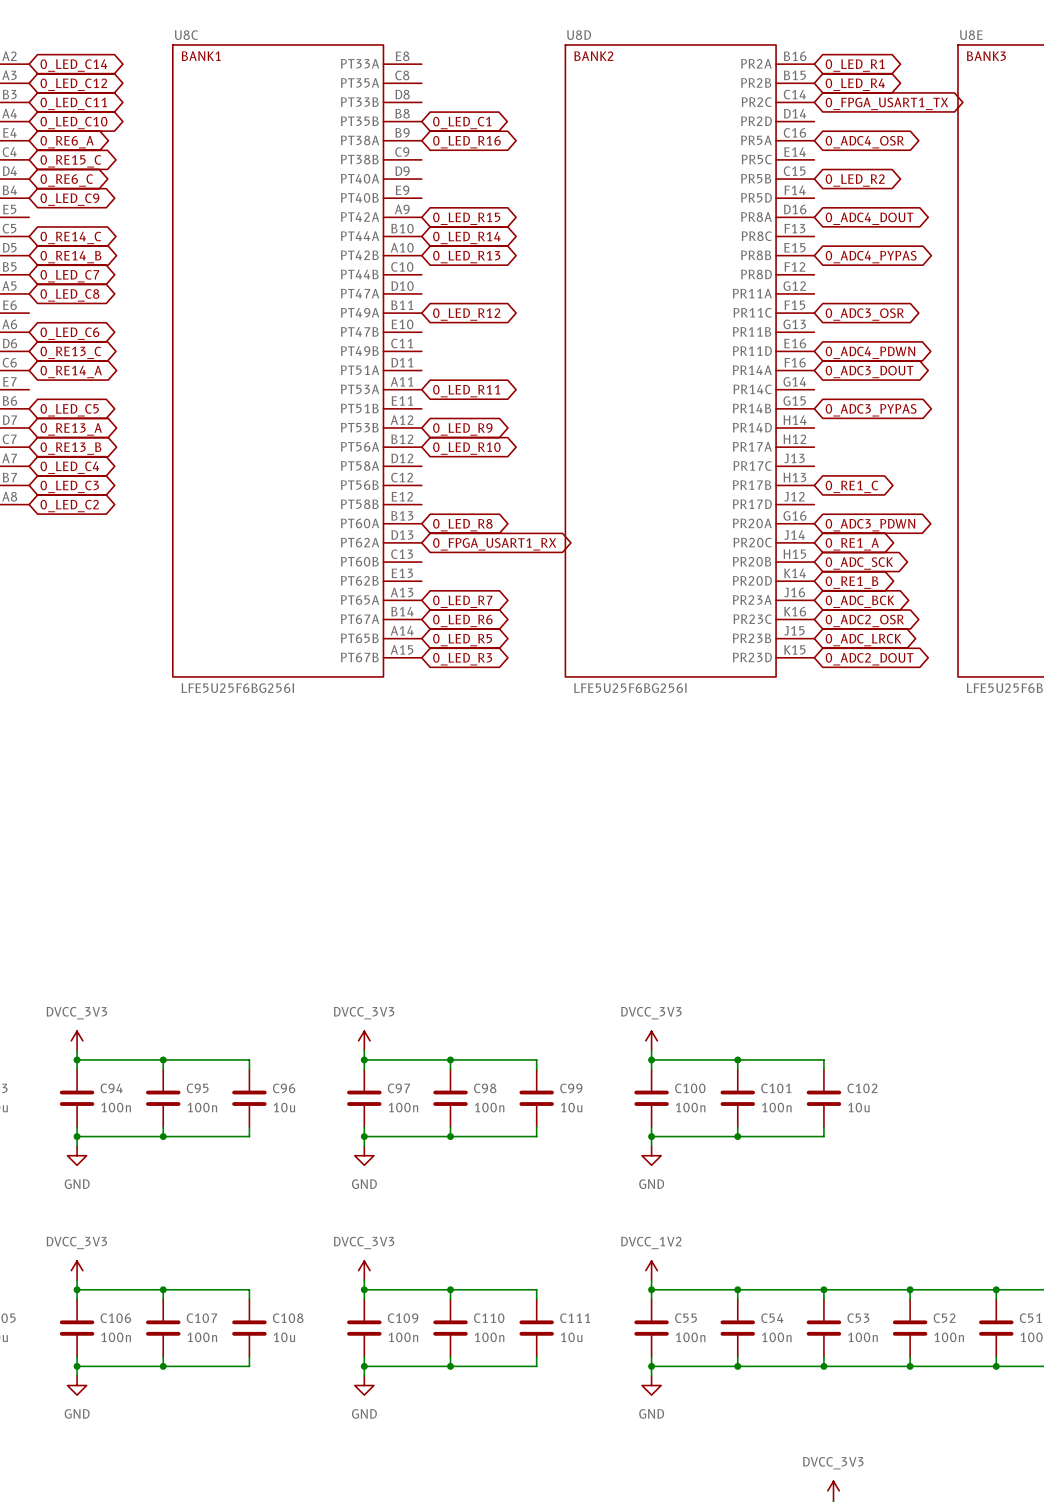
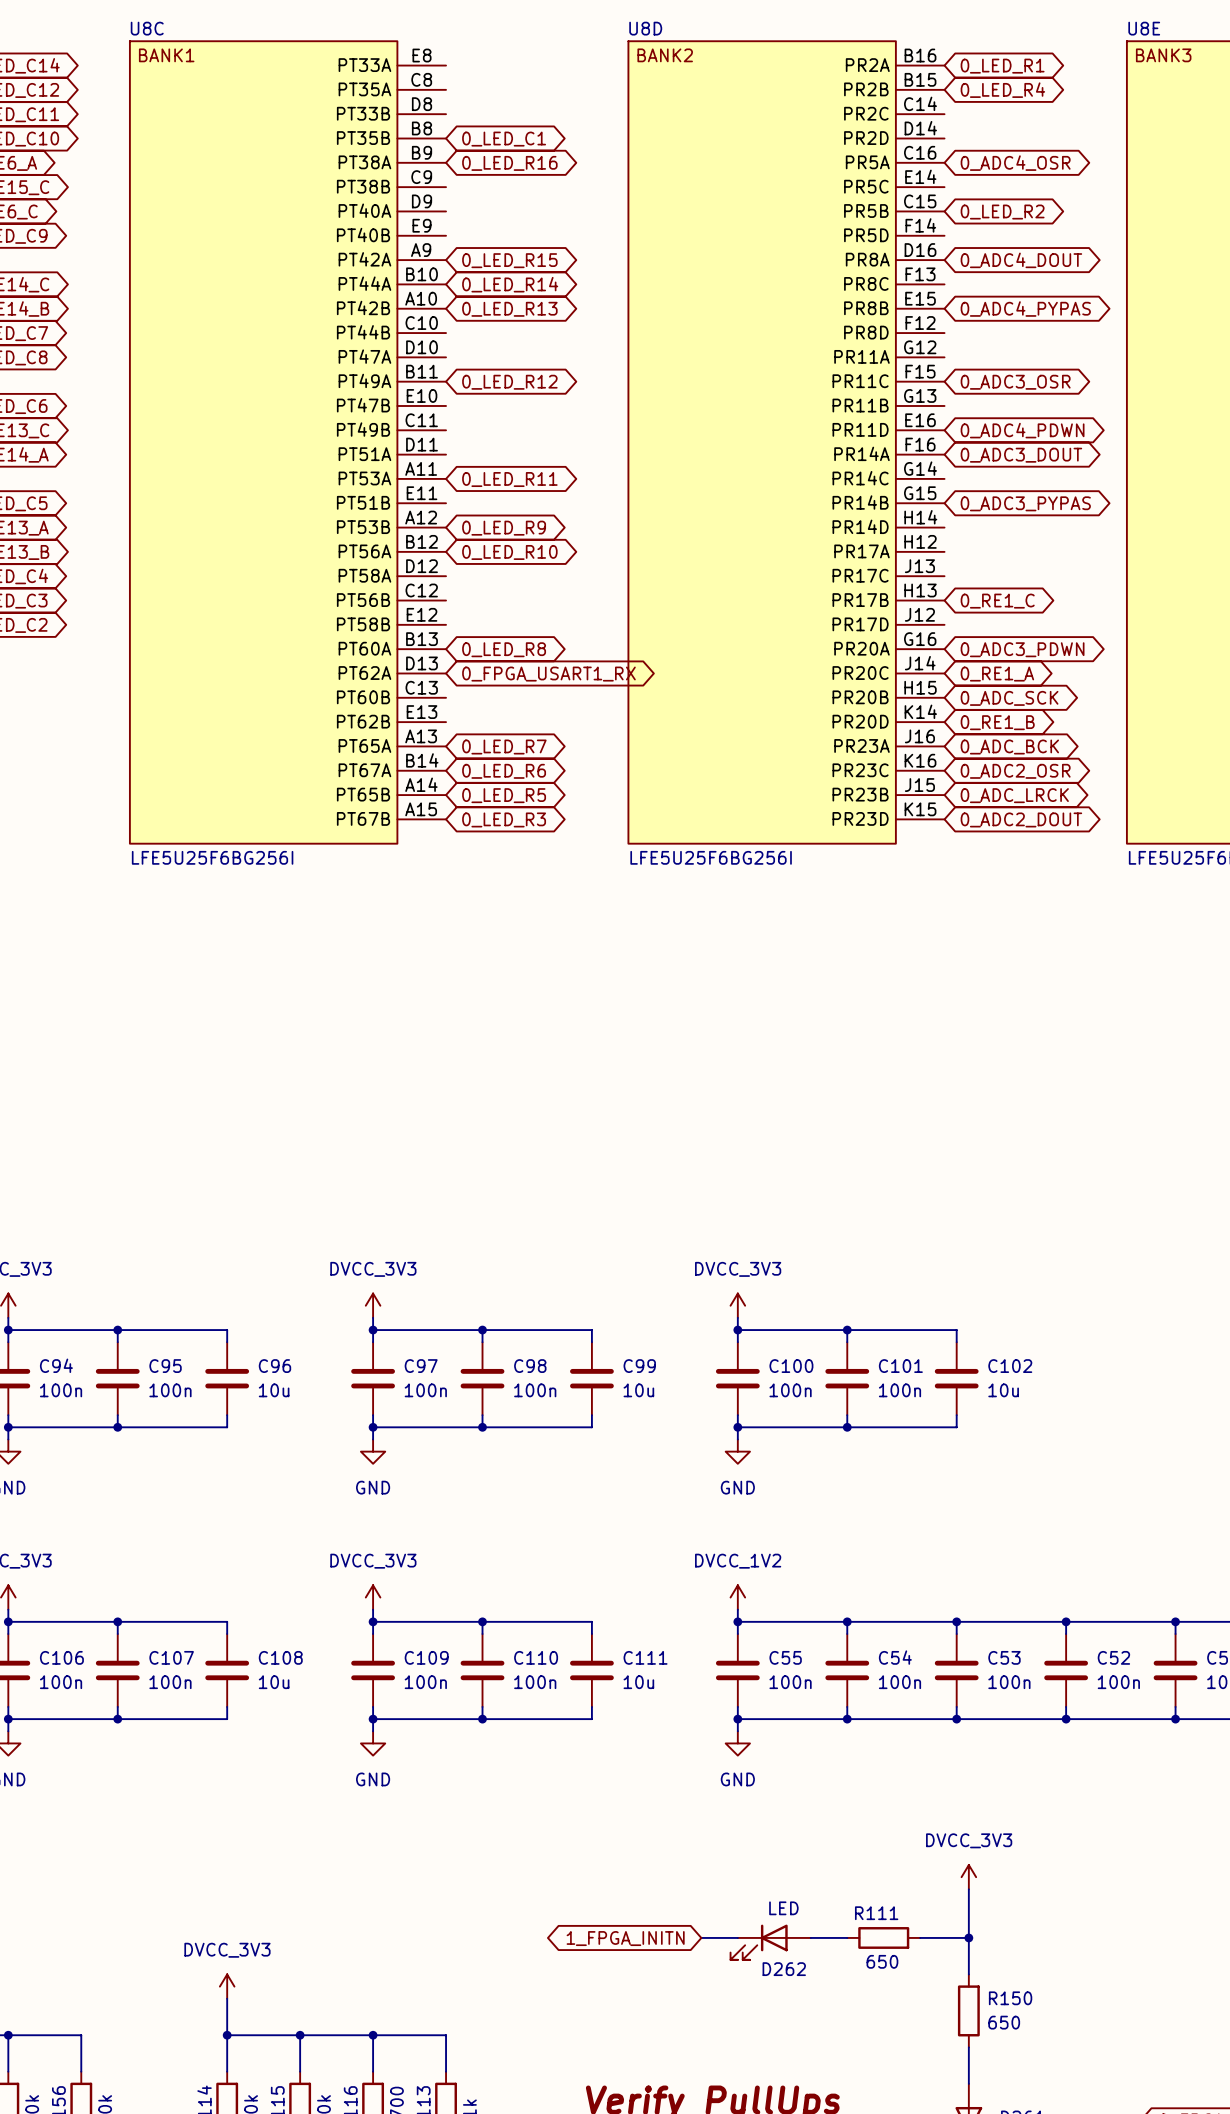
global label: 0_FPGA_USART1_TX (886, 103) -> none

